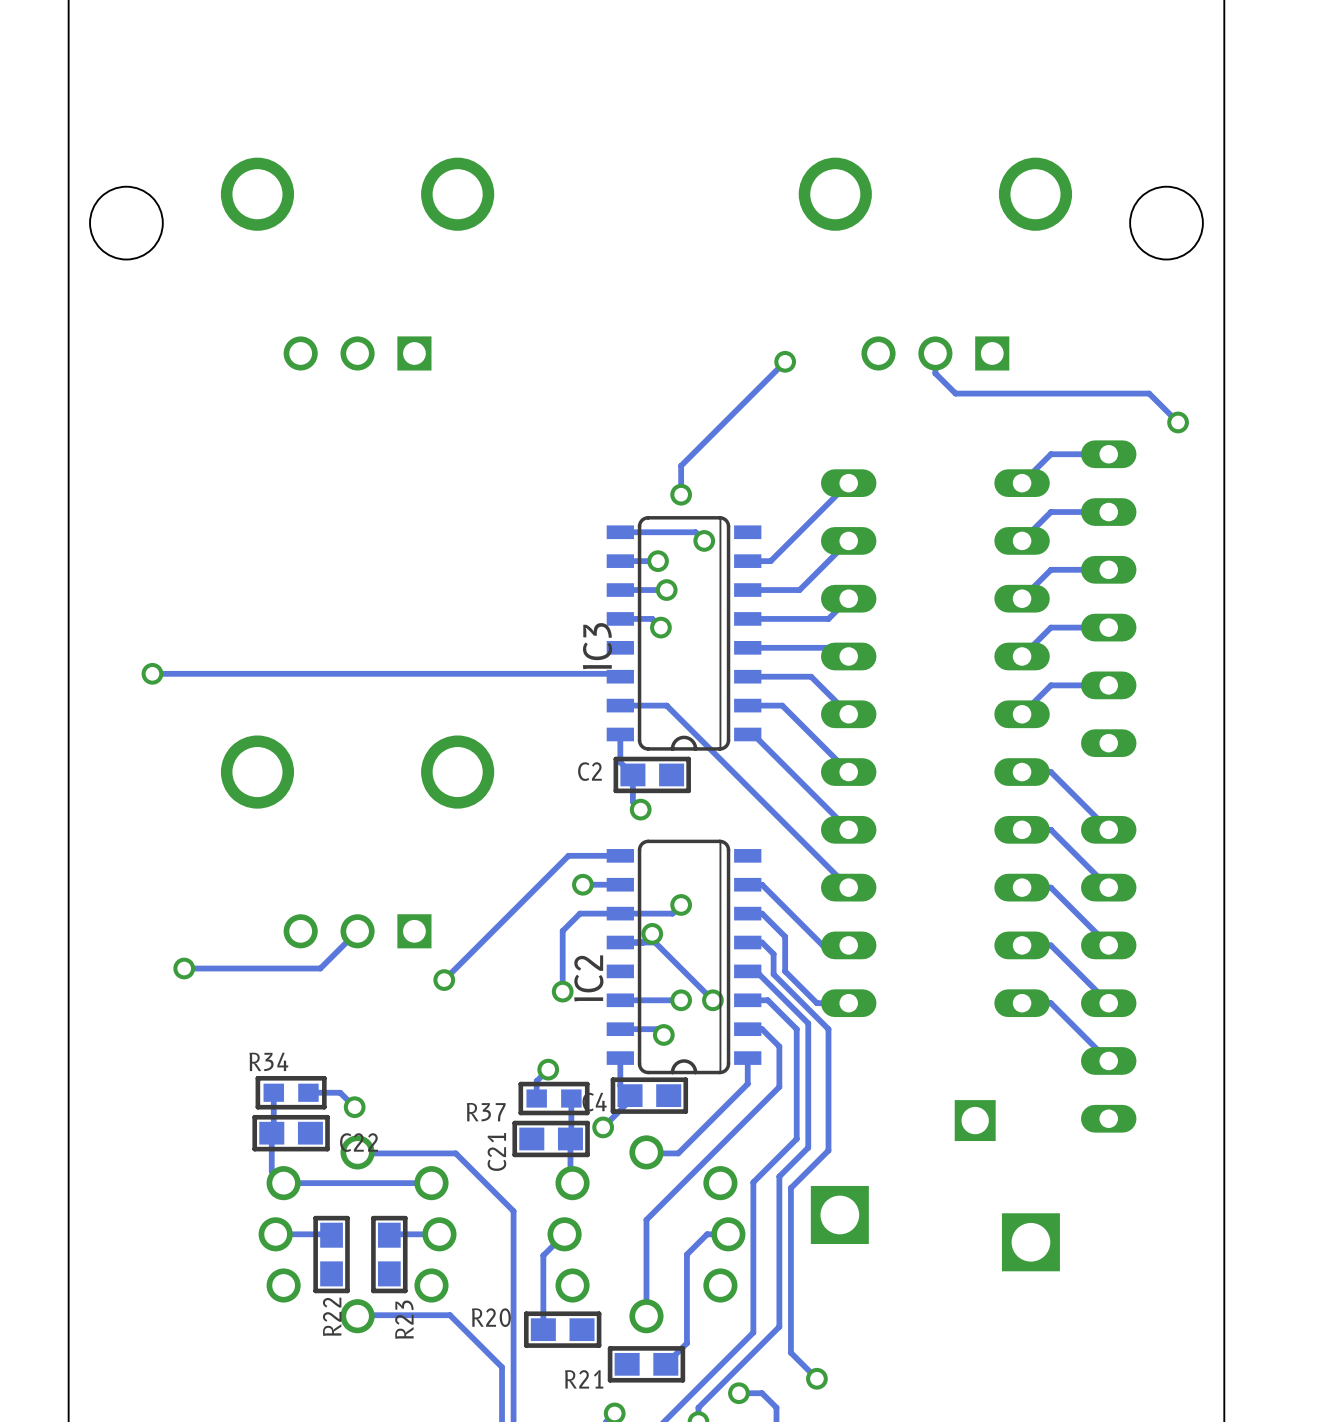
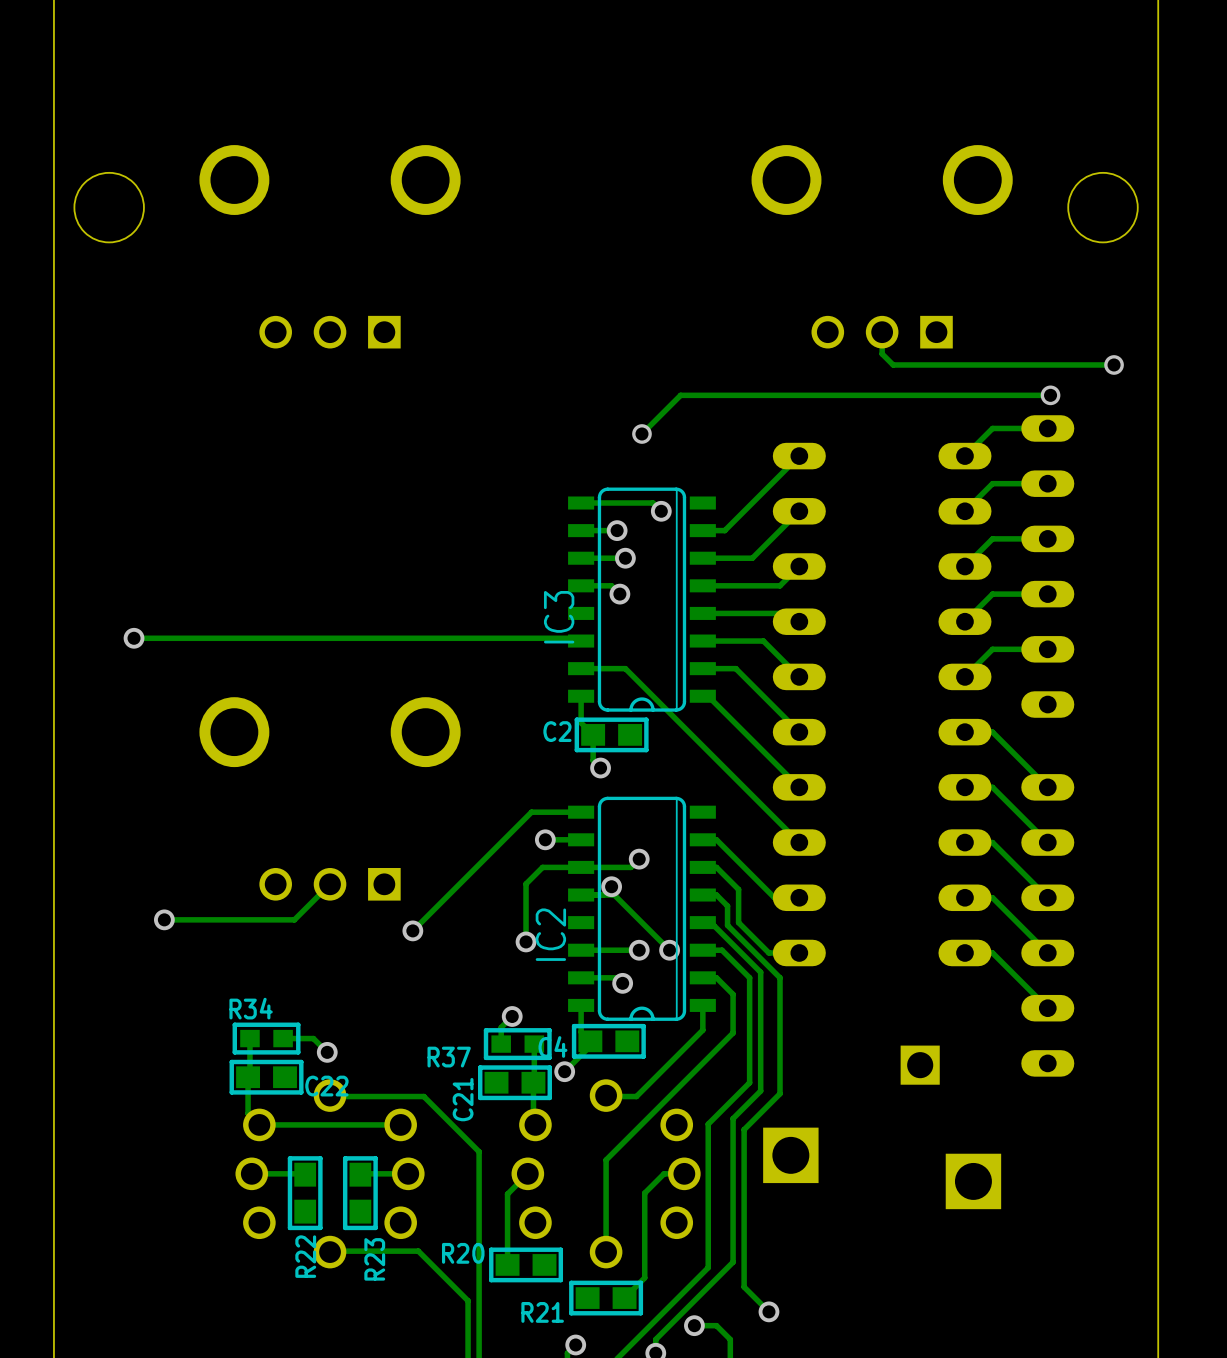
track: (785, 361) (681, 465) (681, 494) -> none
via: (785, 361) -> none
track: (935, 373) (955, 393) (1149, 393) (1178, 422) -> (882, 351) (882, 353) (893, 364) (1114, 364)
via: none -> (1114, 364)
track: none -> (1050, 395) (680, 395) (641, 433)
via: none -> (1050, 395)
via: (1178, 422) -> none
via: none -> (641, 433)
via: (681, 494) -> none

